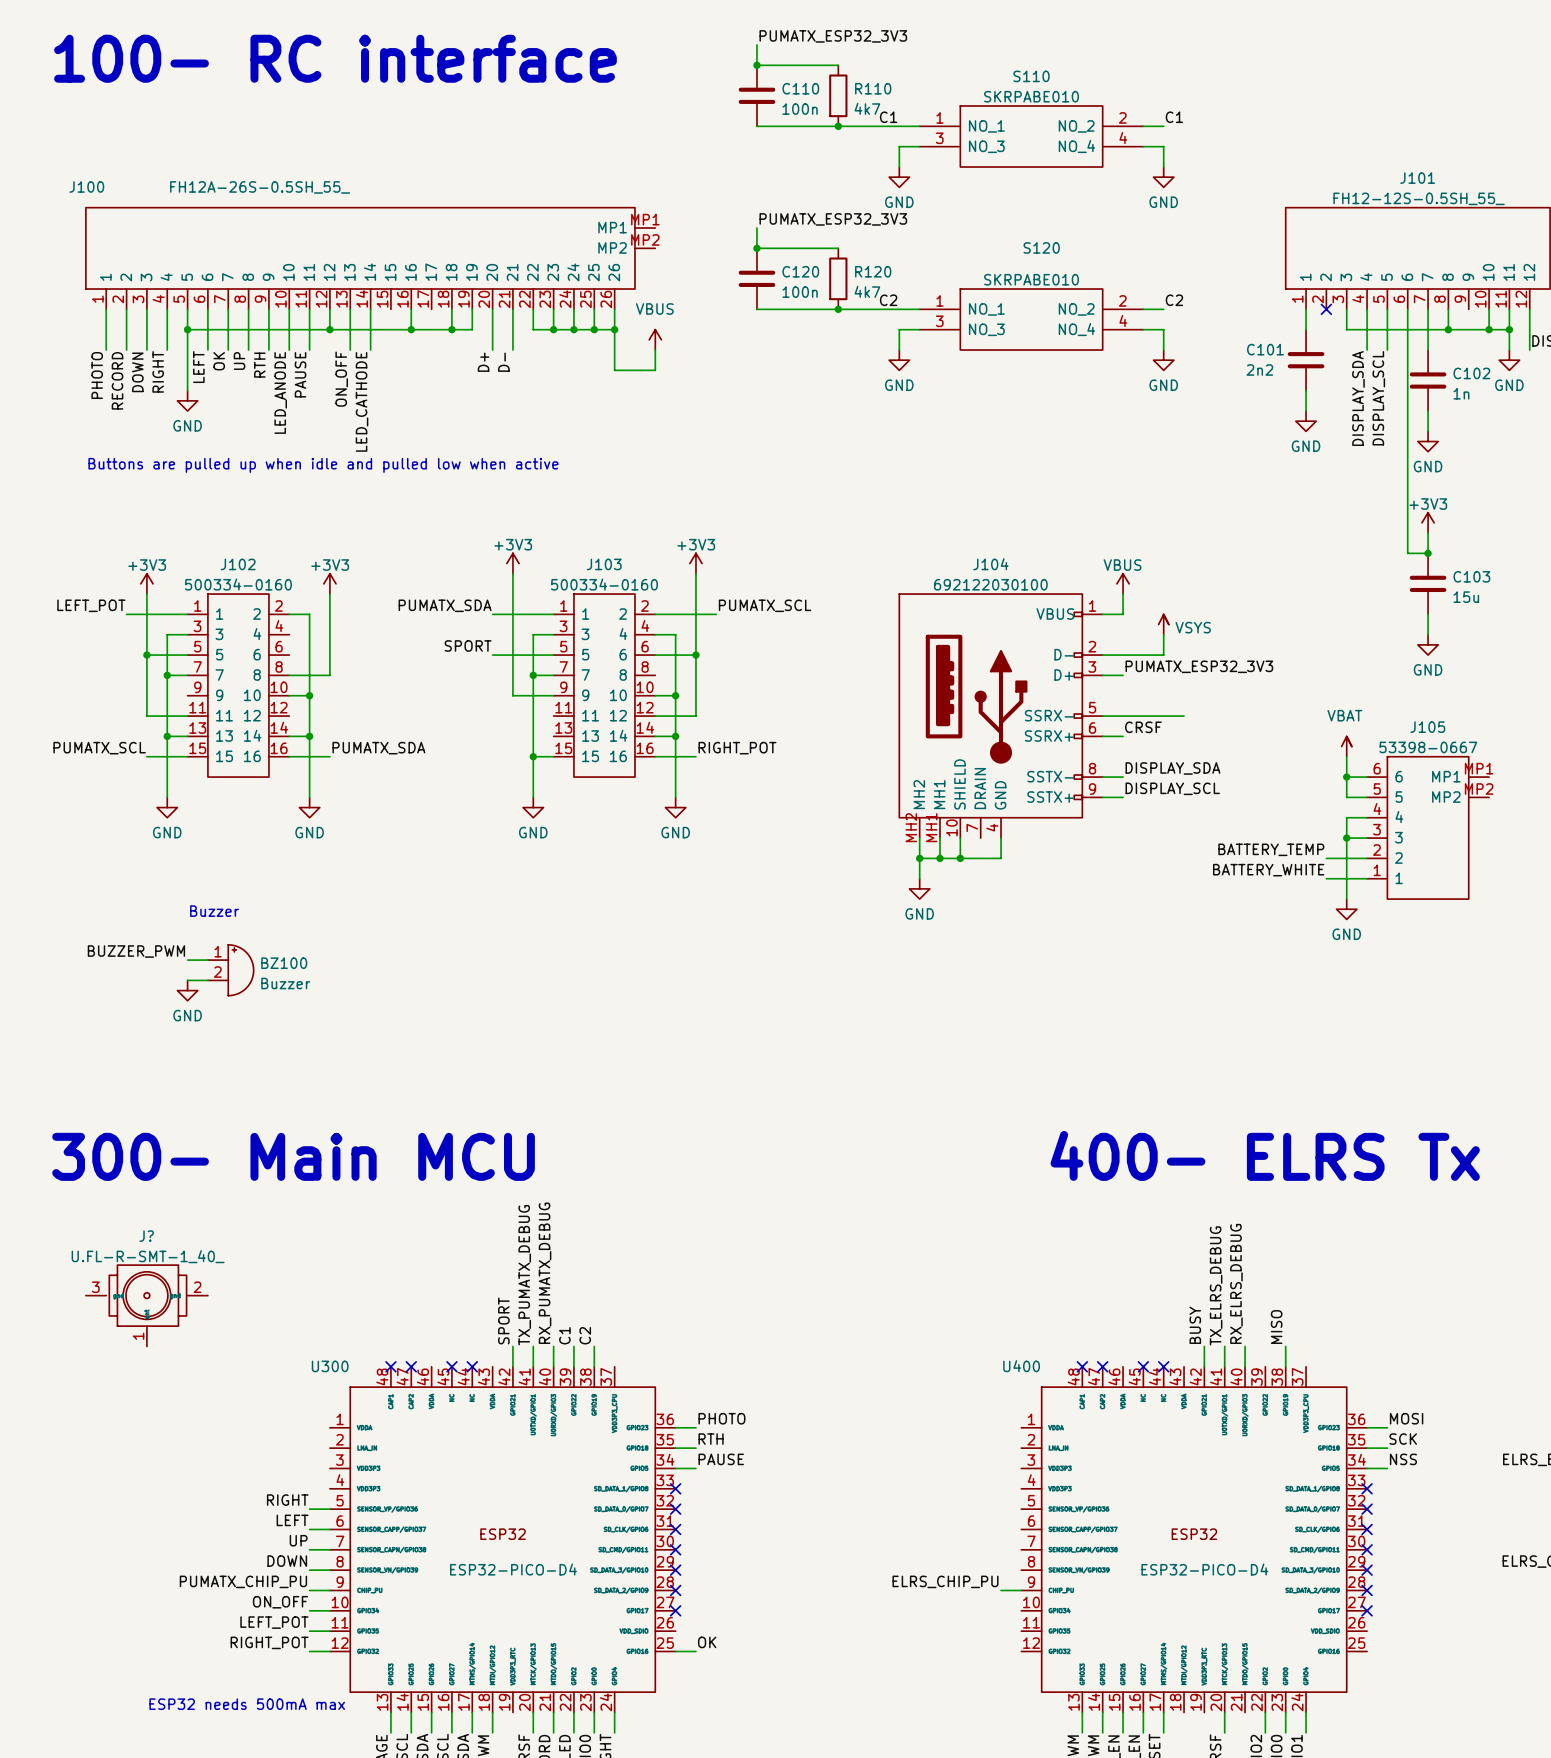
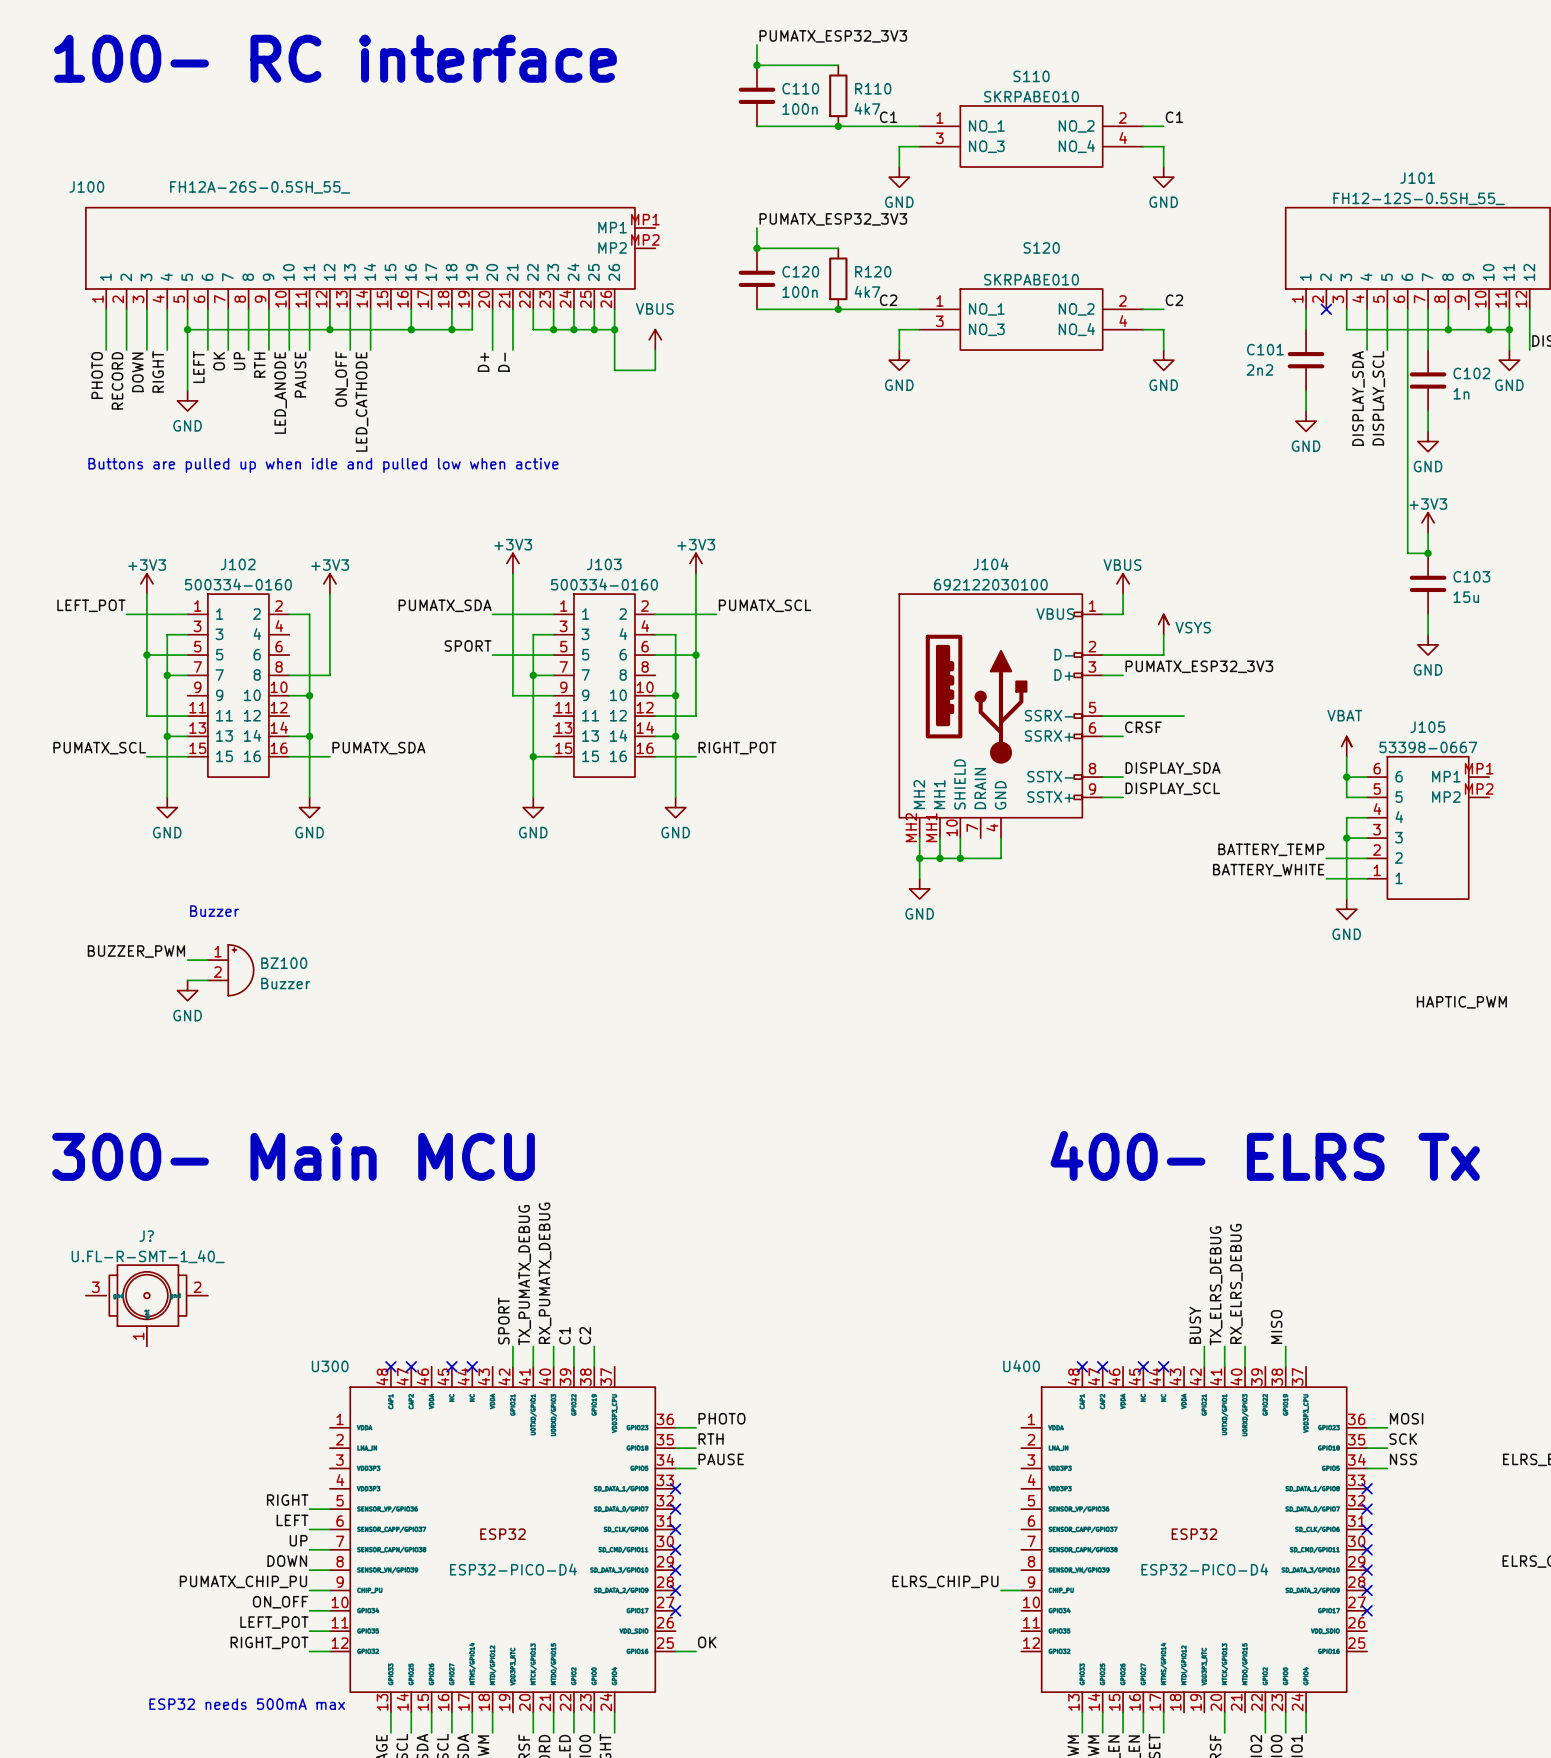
label: none -> HAPTIC_PWM (1461, 1002)

